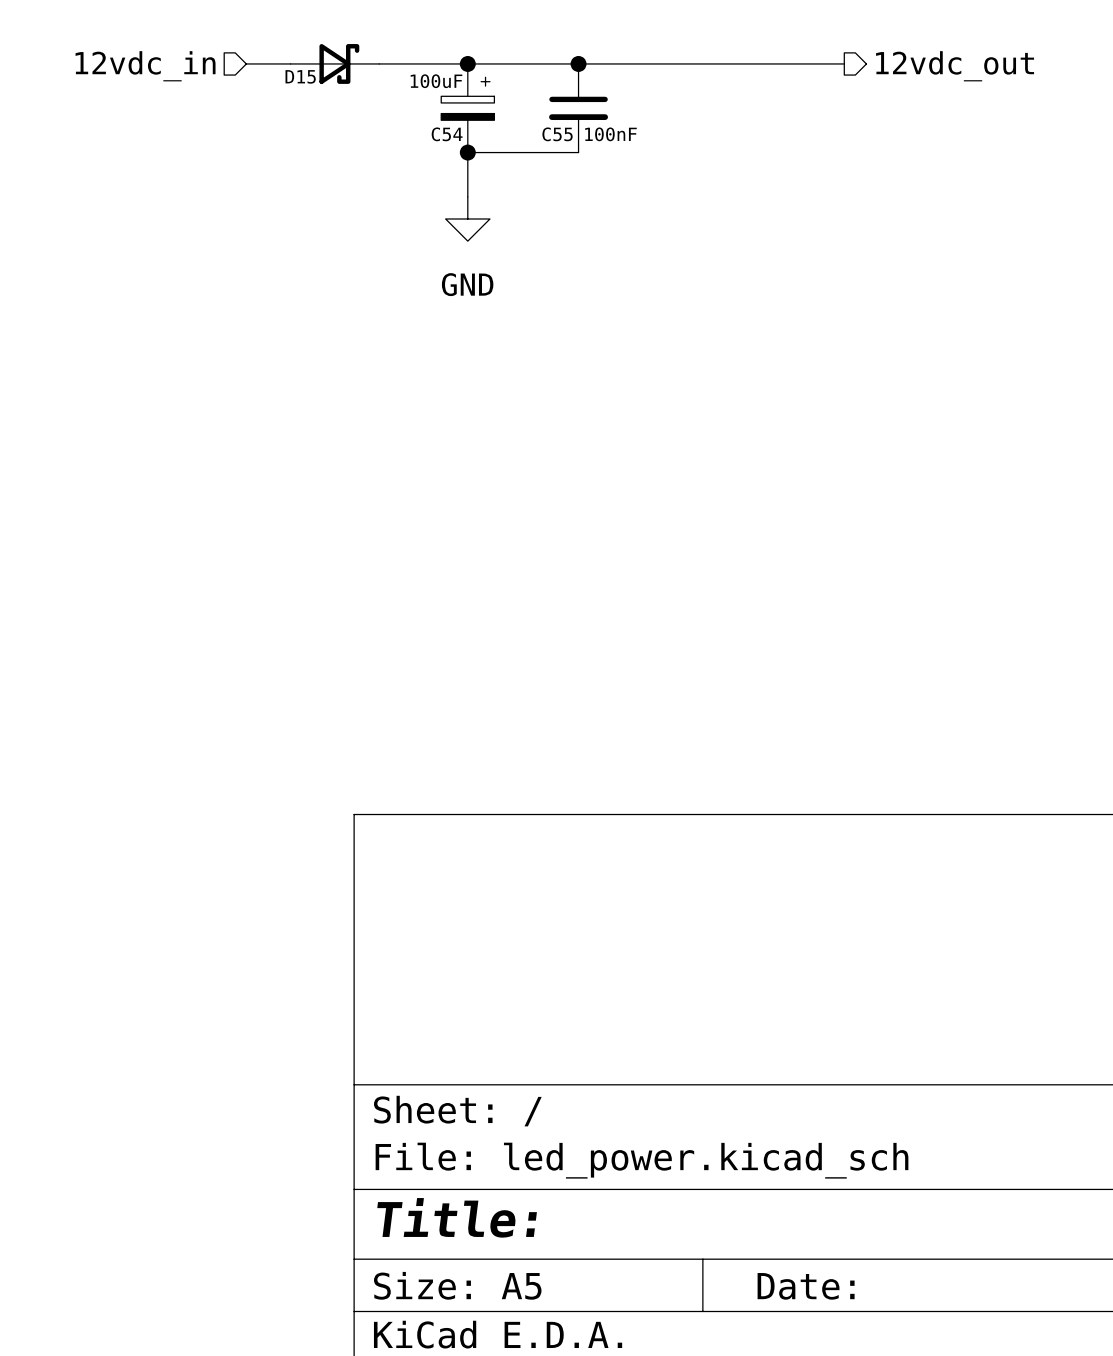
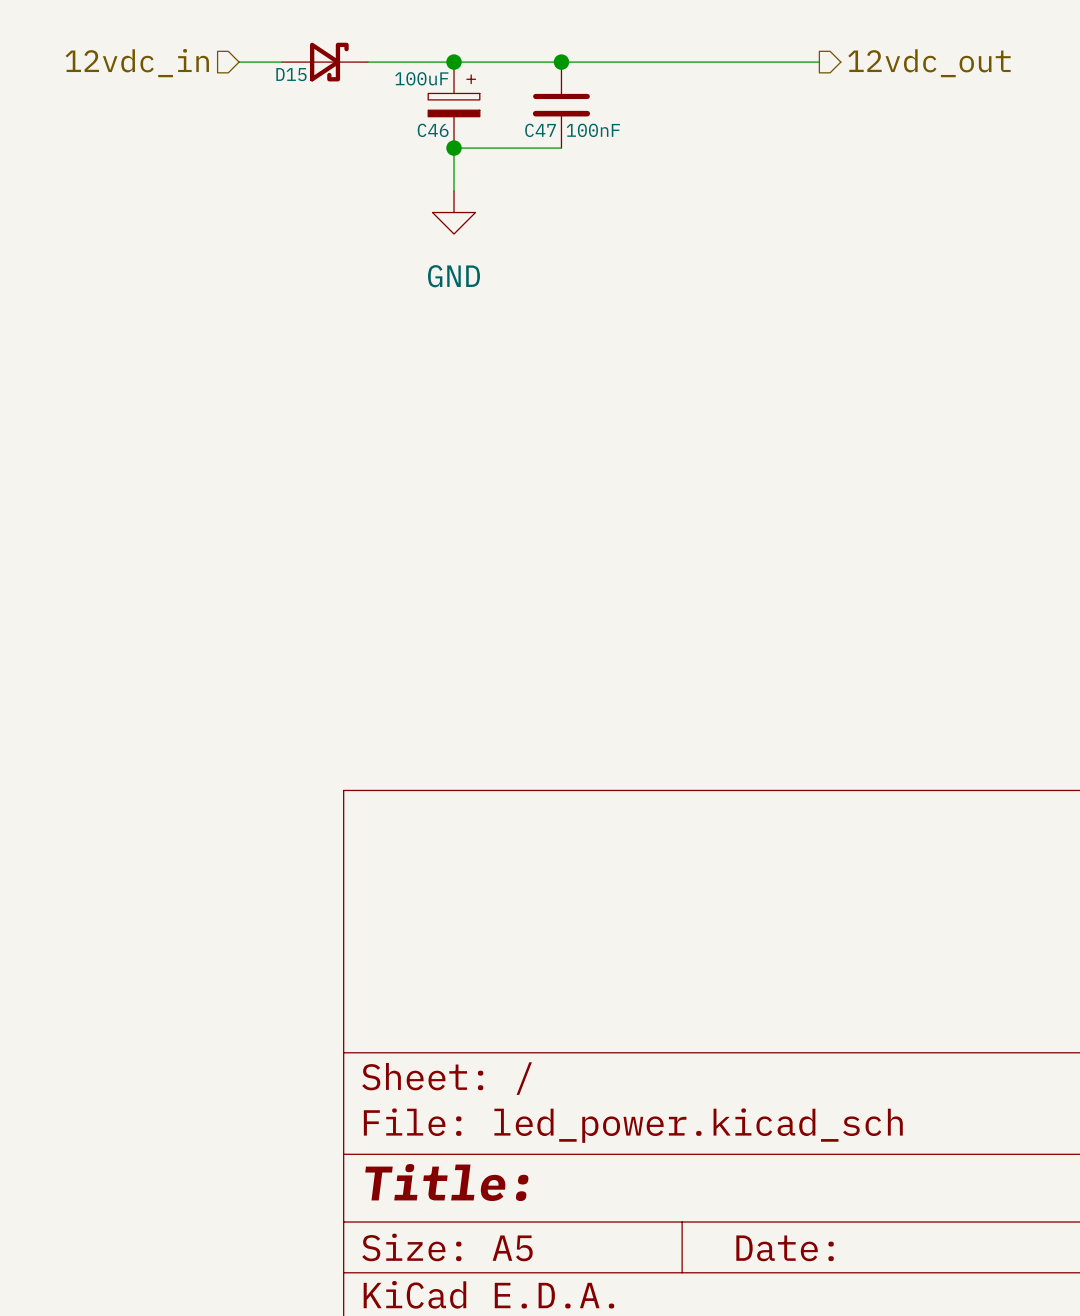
C54 name: C54 (447, 134) -> C46 (433, 130)
C55 name: C55 (557, 134) -> C47 (540, 130)

